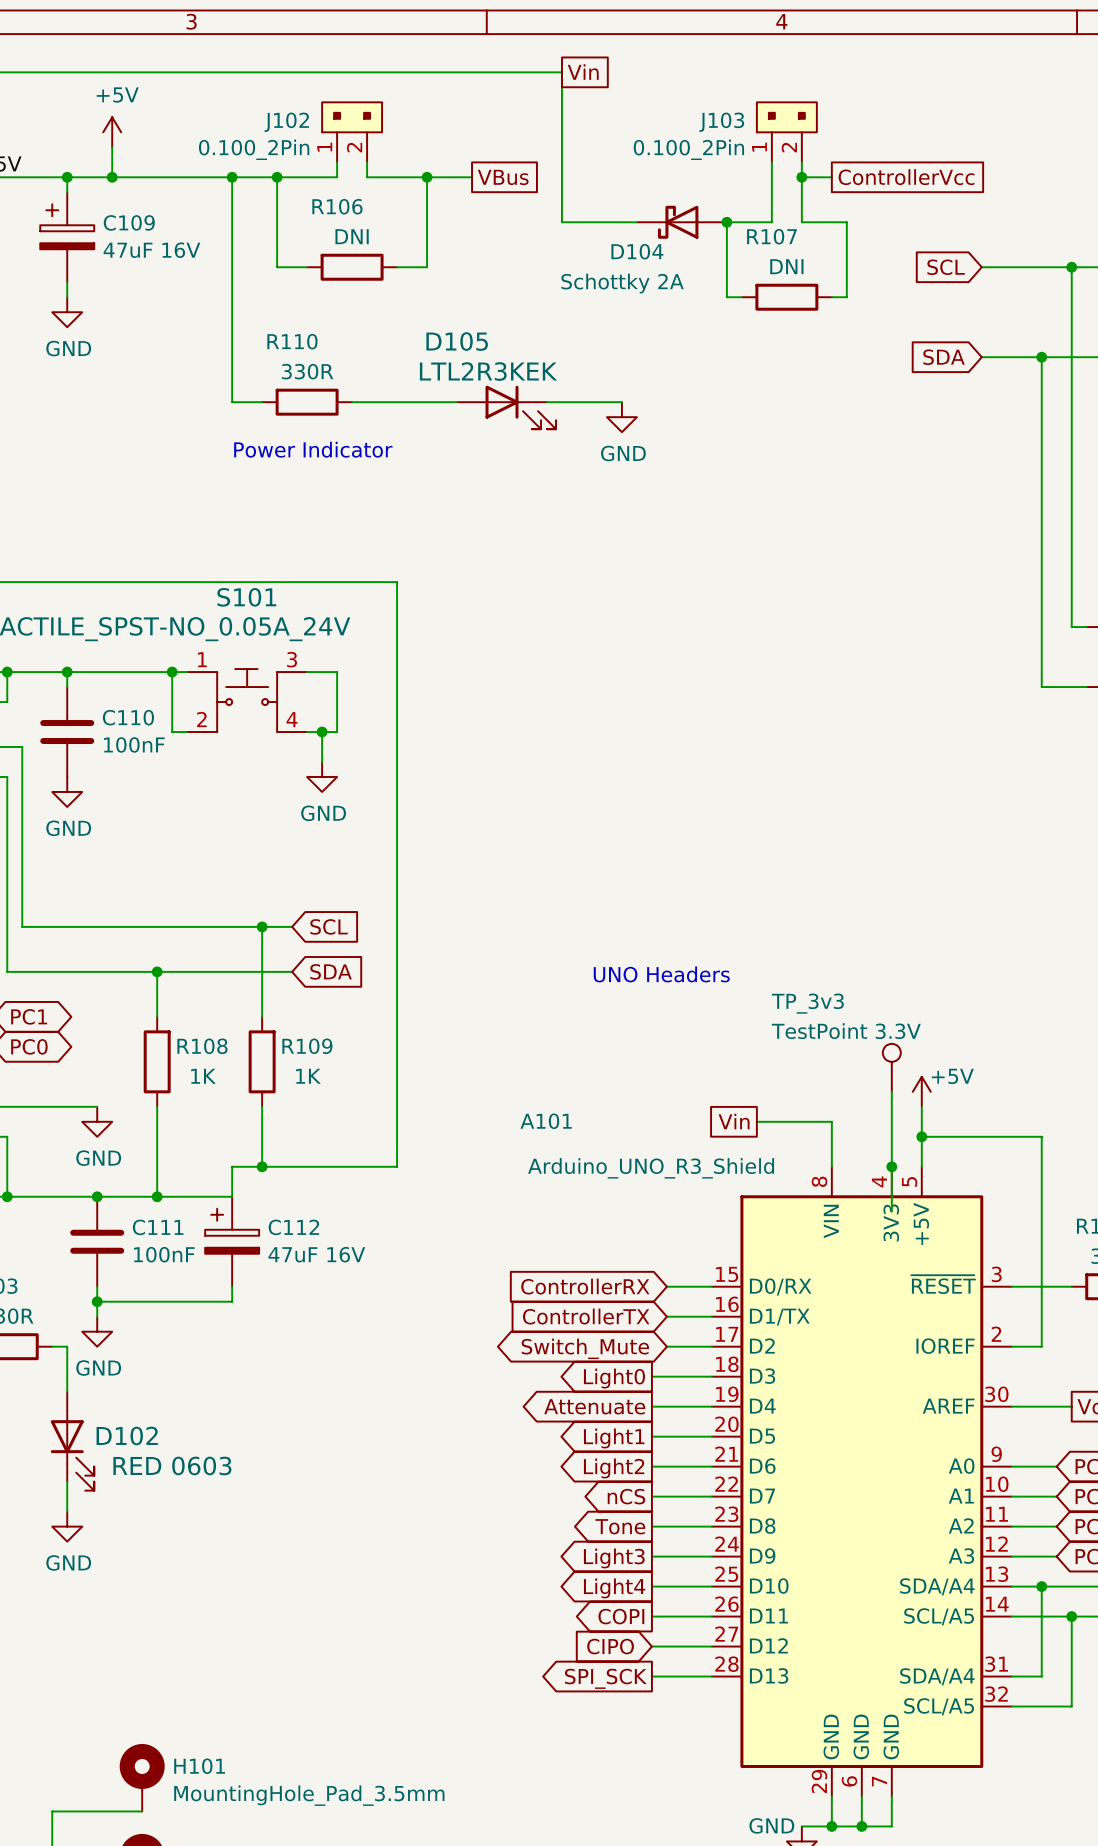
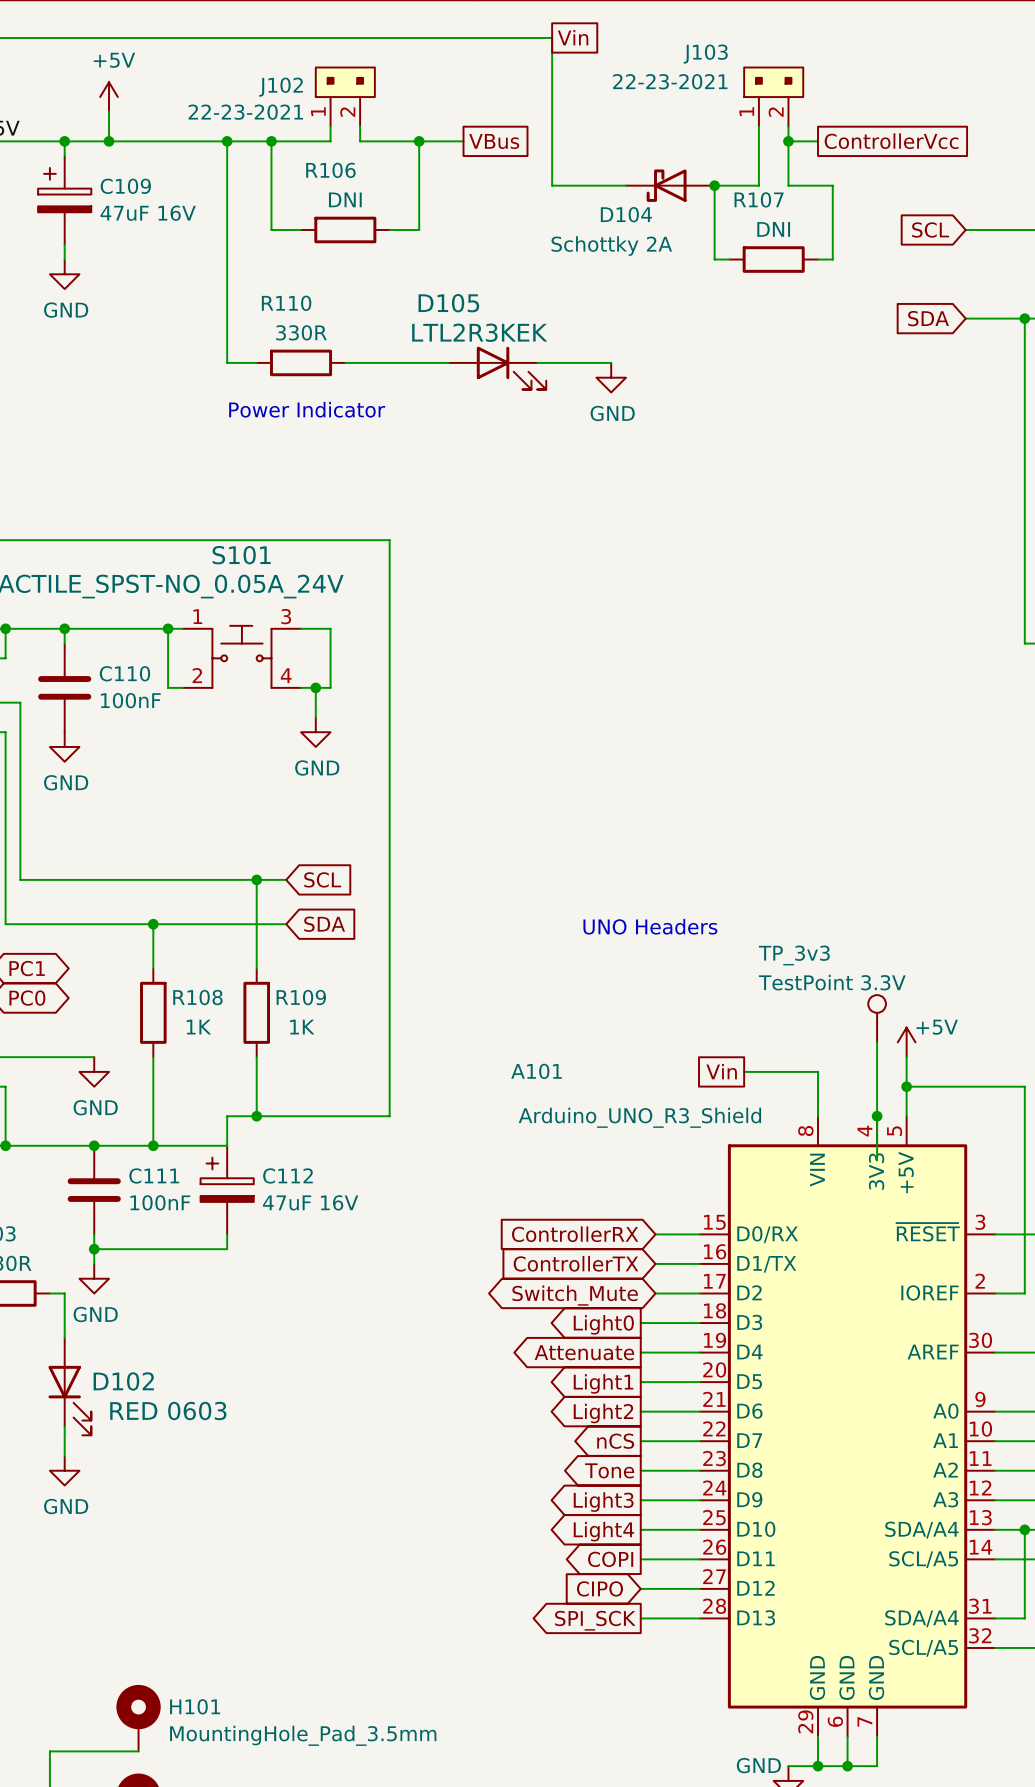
J103 name position: J103 (721, 122) -> J103 (705, 54)
J102 value: 0.100_2Pin (254, 149) -> 22-23-2021 (245, 112)
J103 value: 0.100_2Pin (688, 149) -> 22-23-2021 (670, 81)

